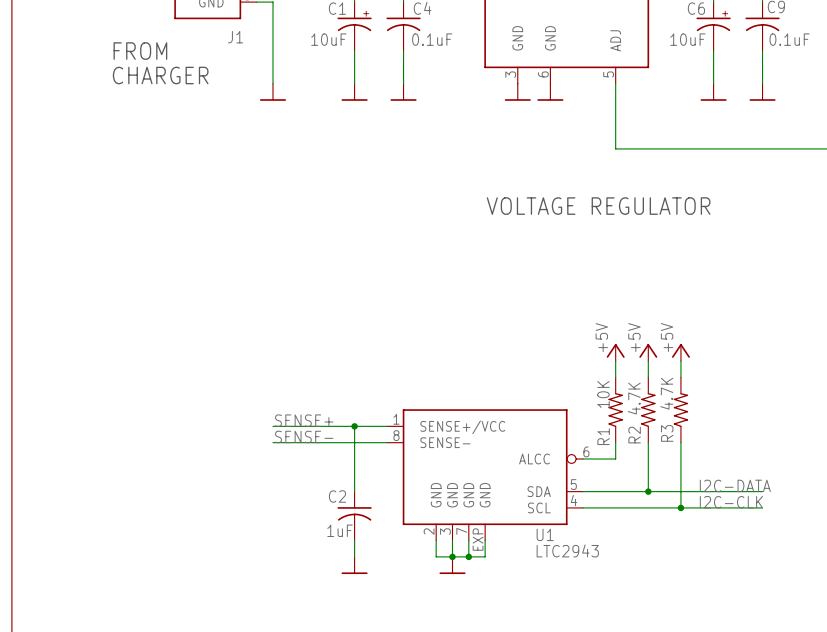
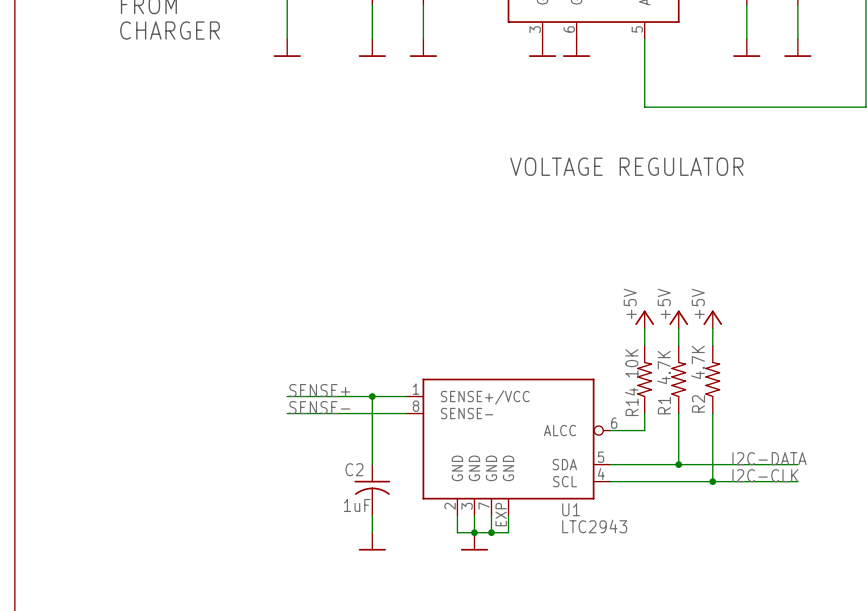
R3 name: R3 (667, 433) -> R2 (698, 403)
R2 name: R2 (634, 435) -> R1 (664, 405)
R1 name: R1 (603, 436) -> R14 (631, 401)

